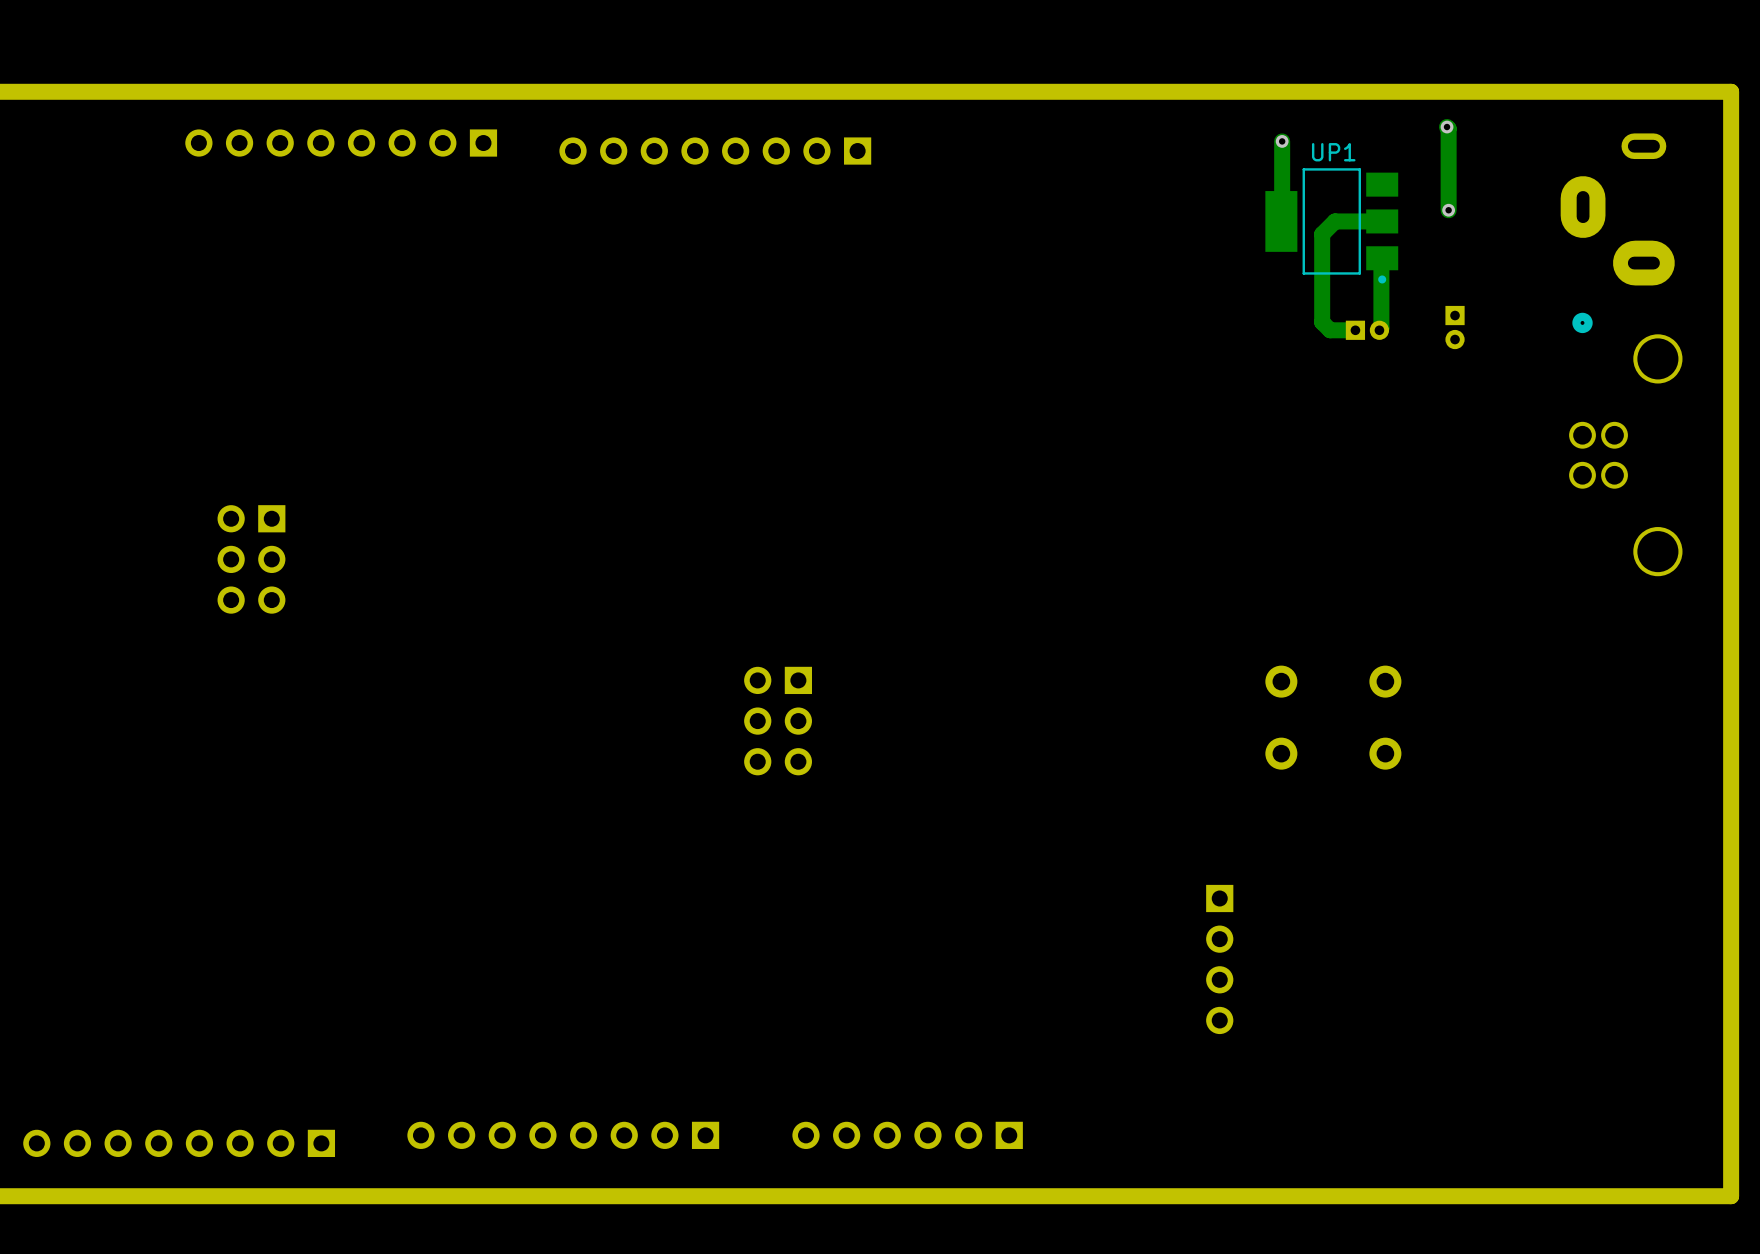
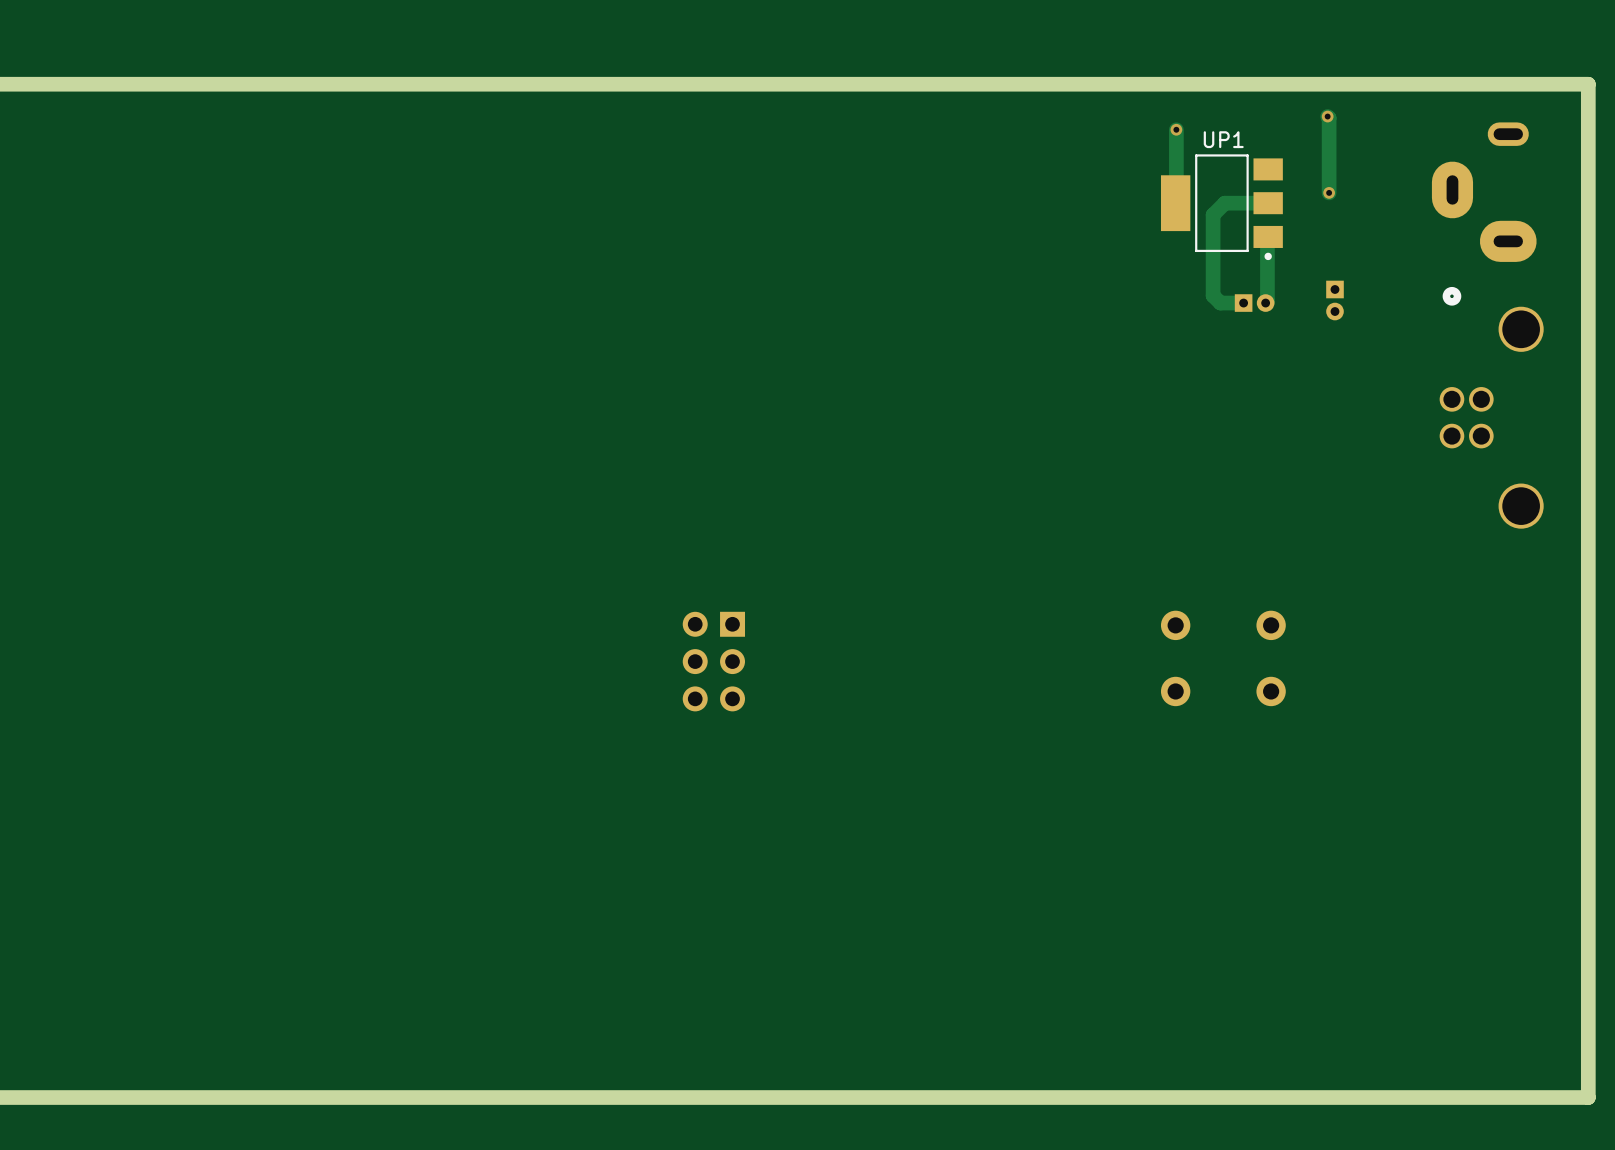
part: (341, 143) -> none
part: (715, 151) -> none
part: (251, 559) -> none
part: (1219, 959) -> none
part: (563, 1135) -> none
part: (907, 1135) -> none
part: (179, 1143) -> none

